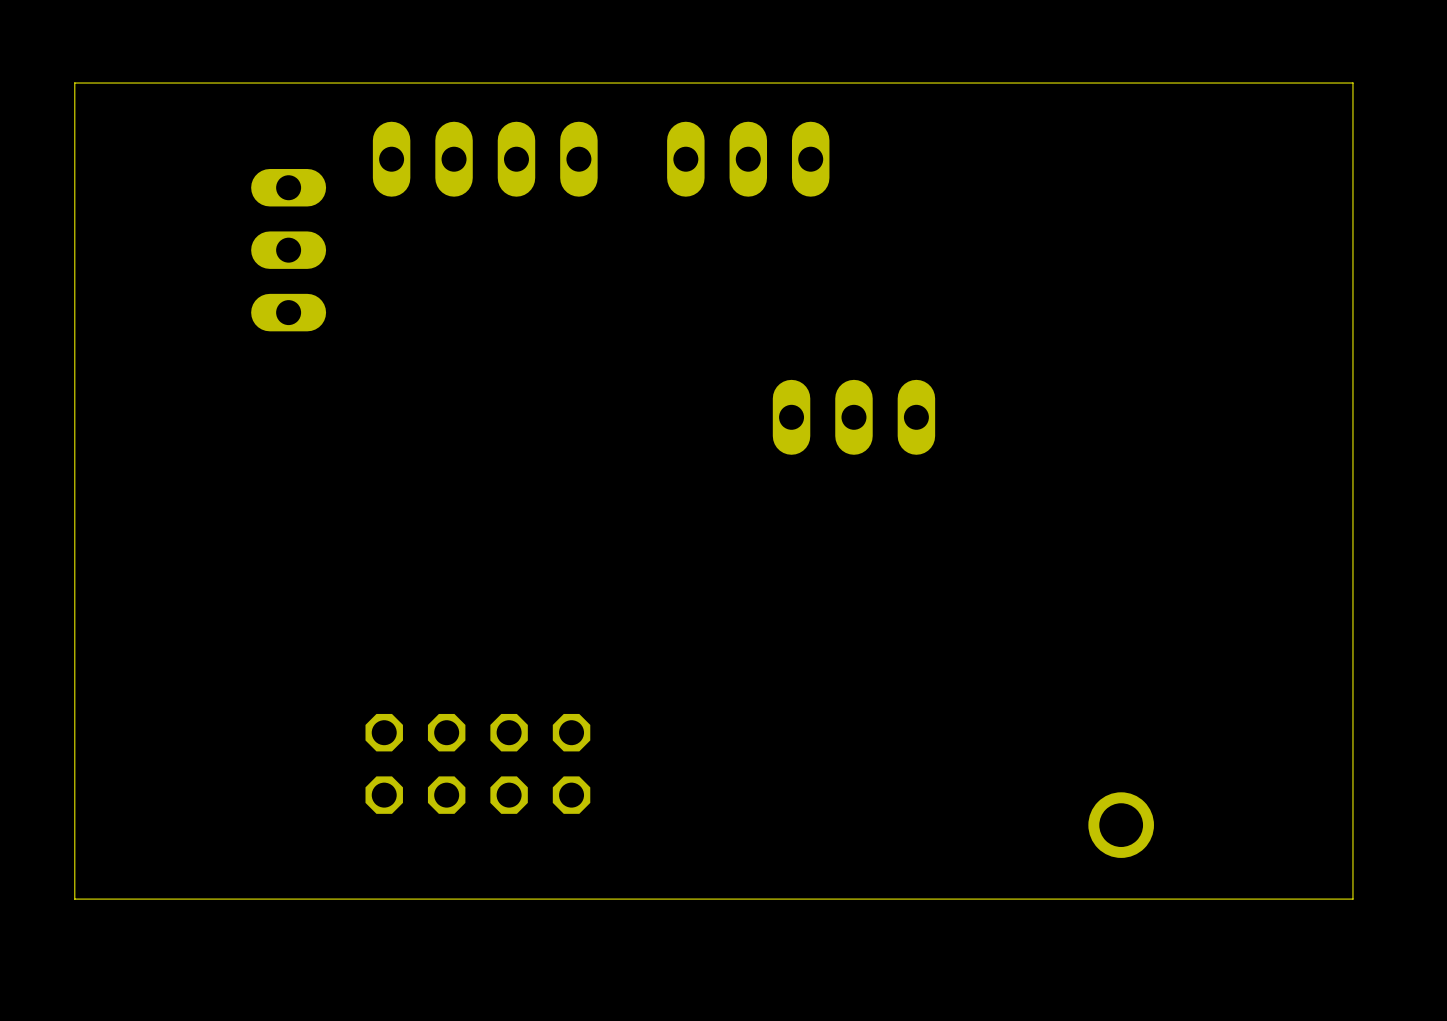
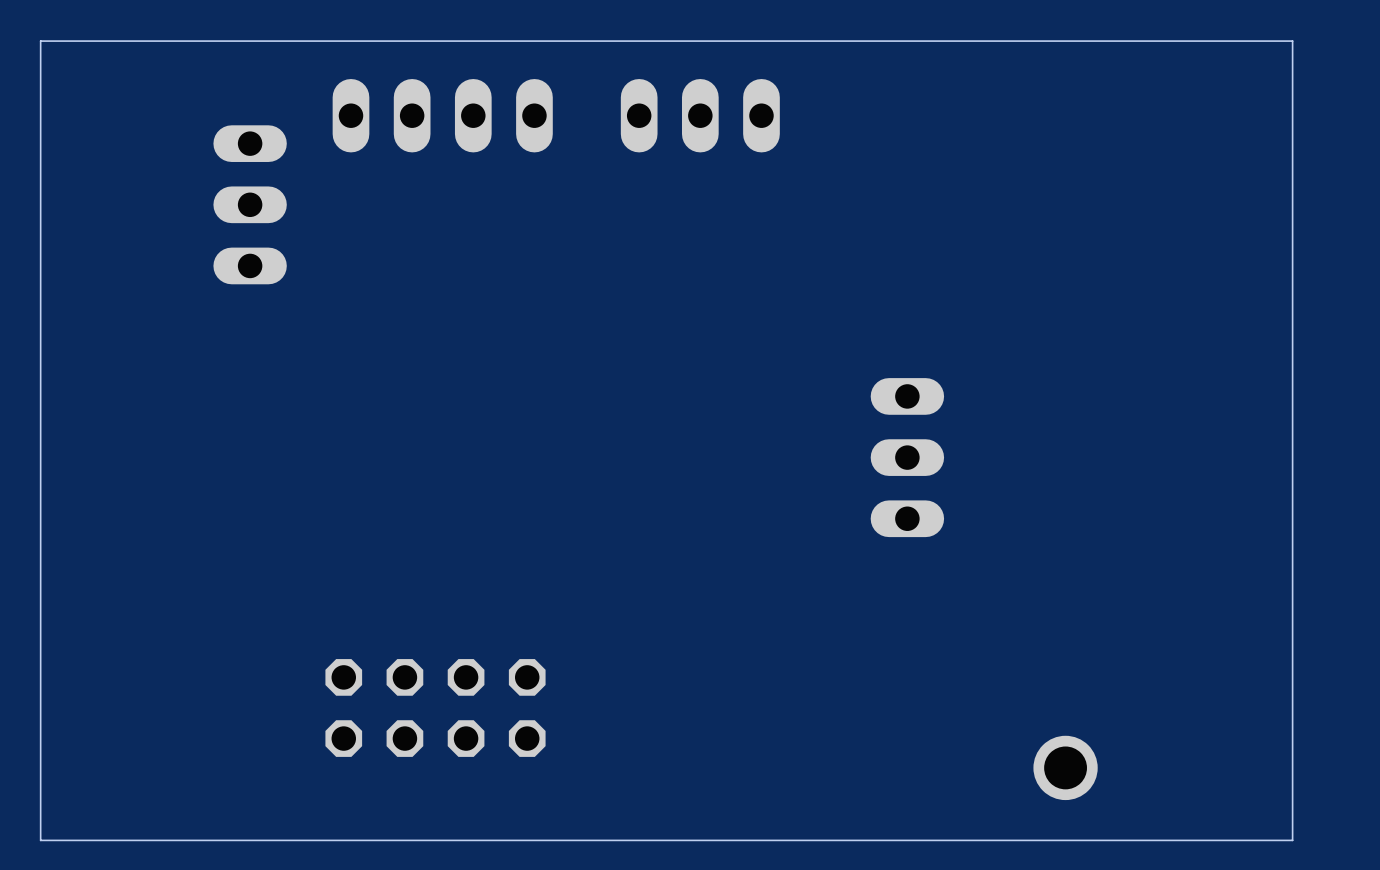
part rotation: 0° (853, 417) -> 90° clockwise (907, 457)
part position: (853, 417) -> (907, 457)

